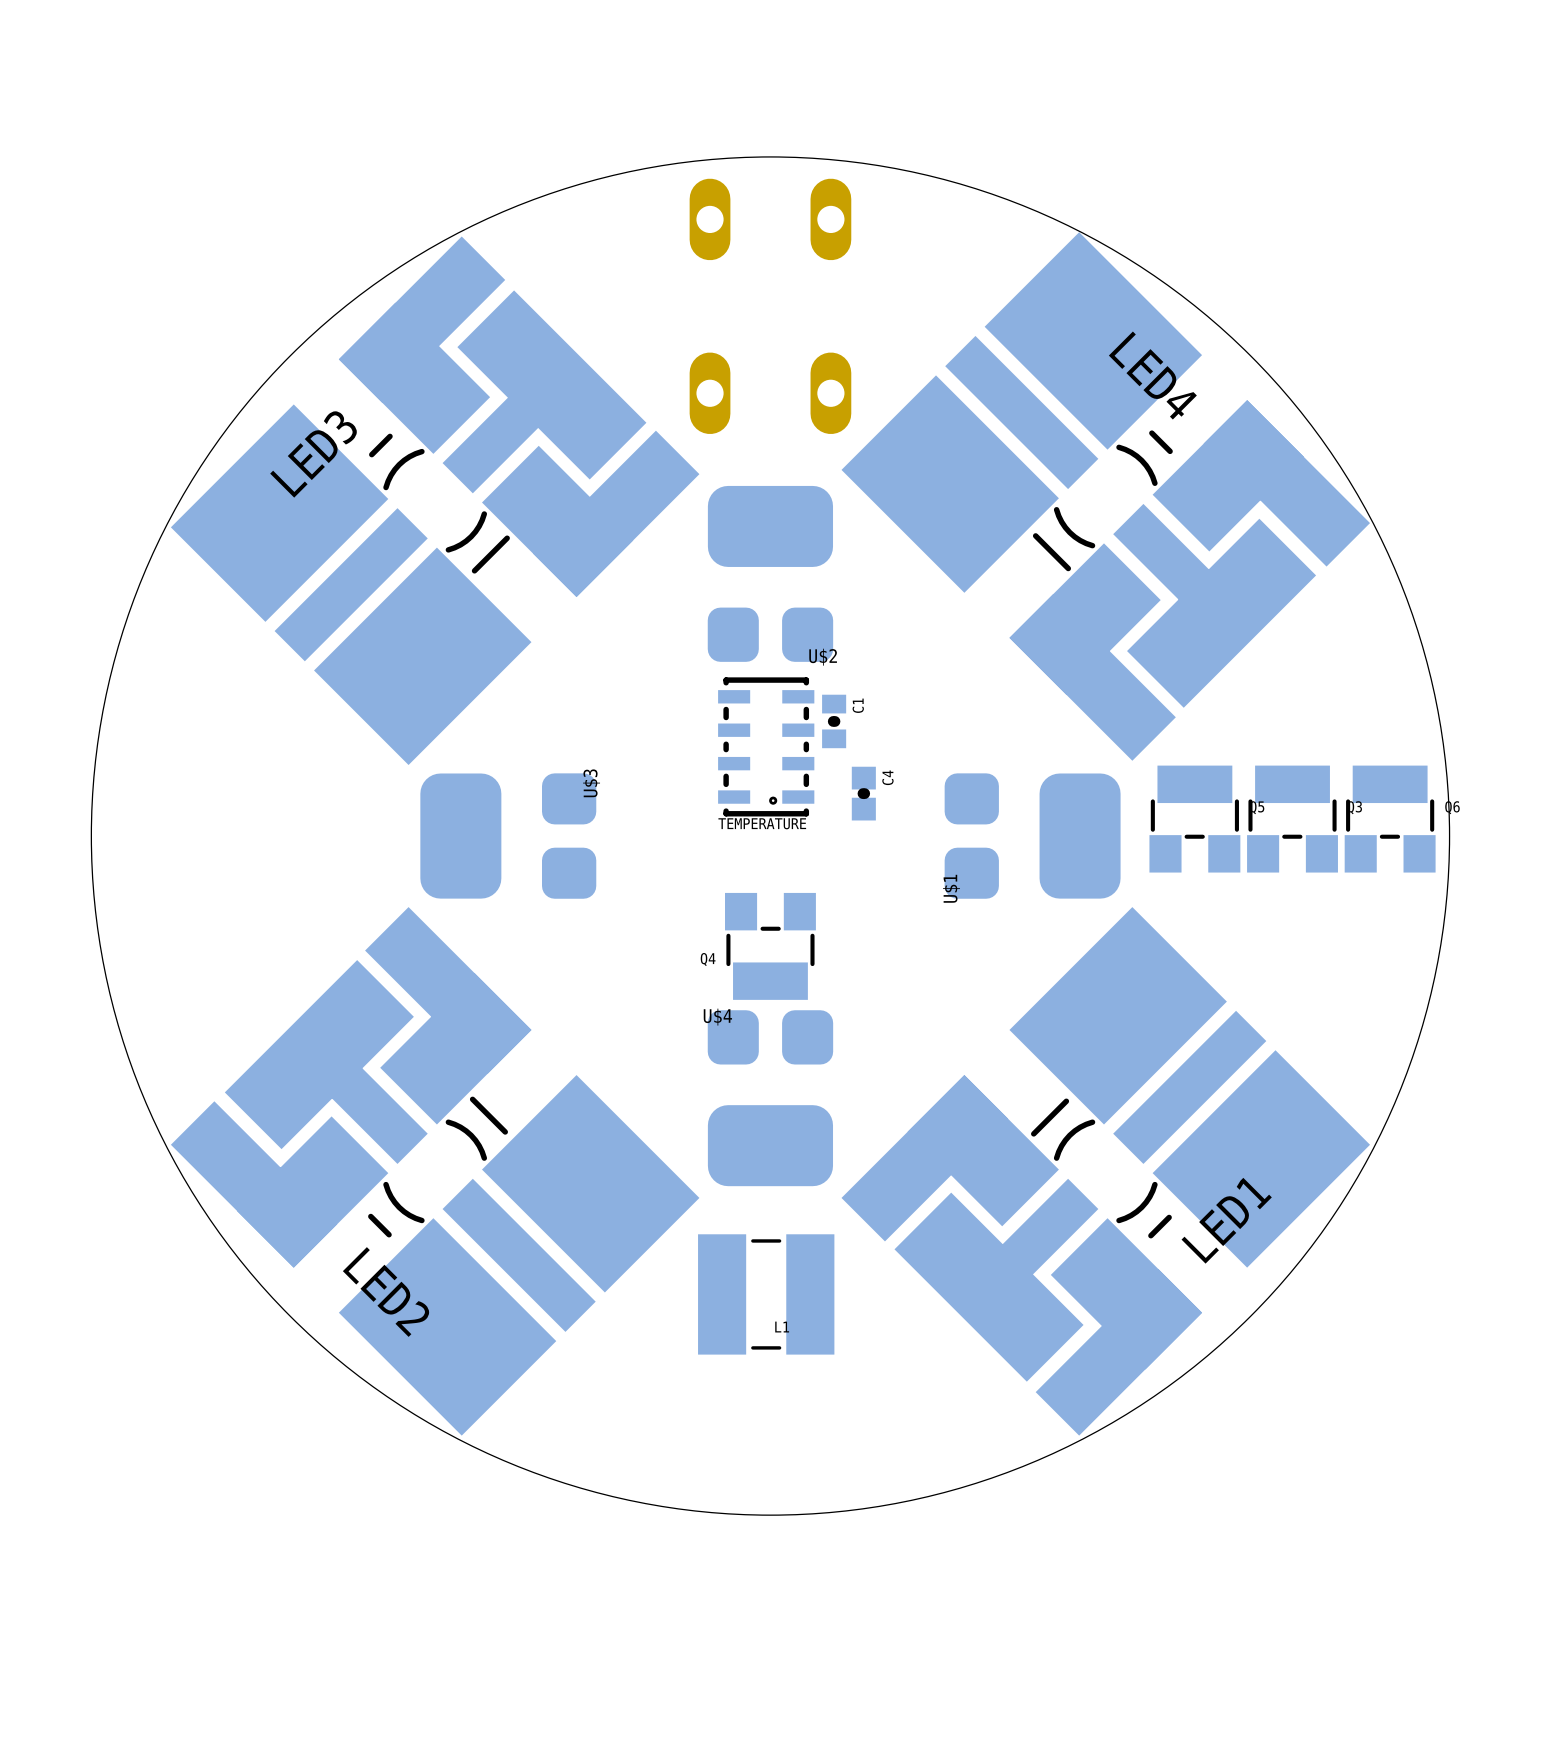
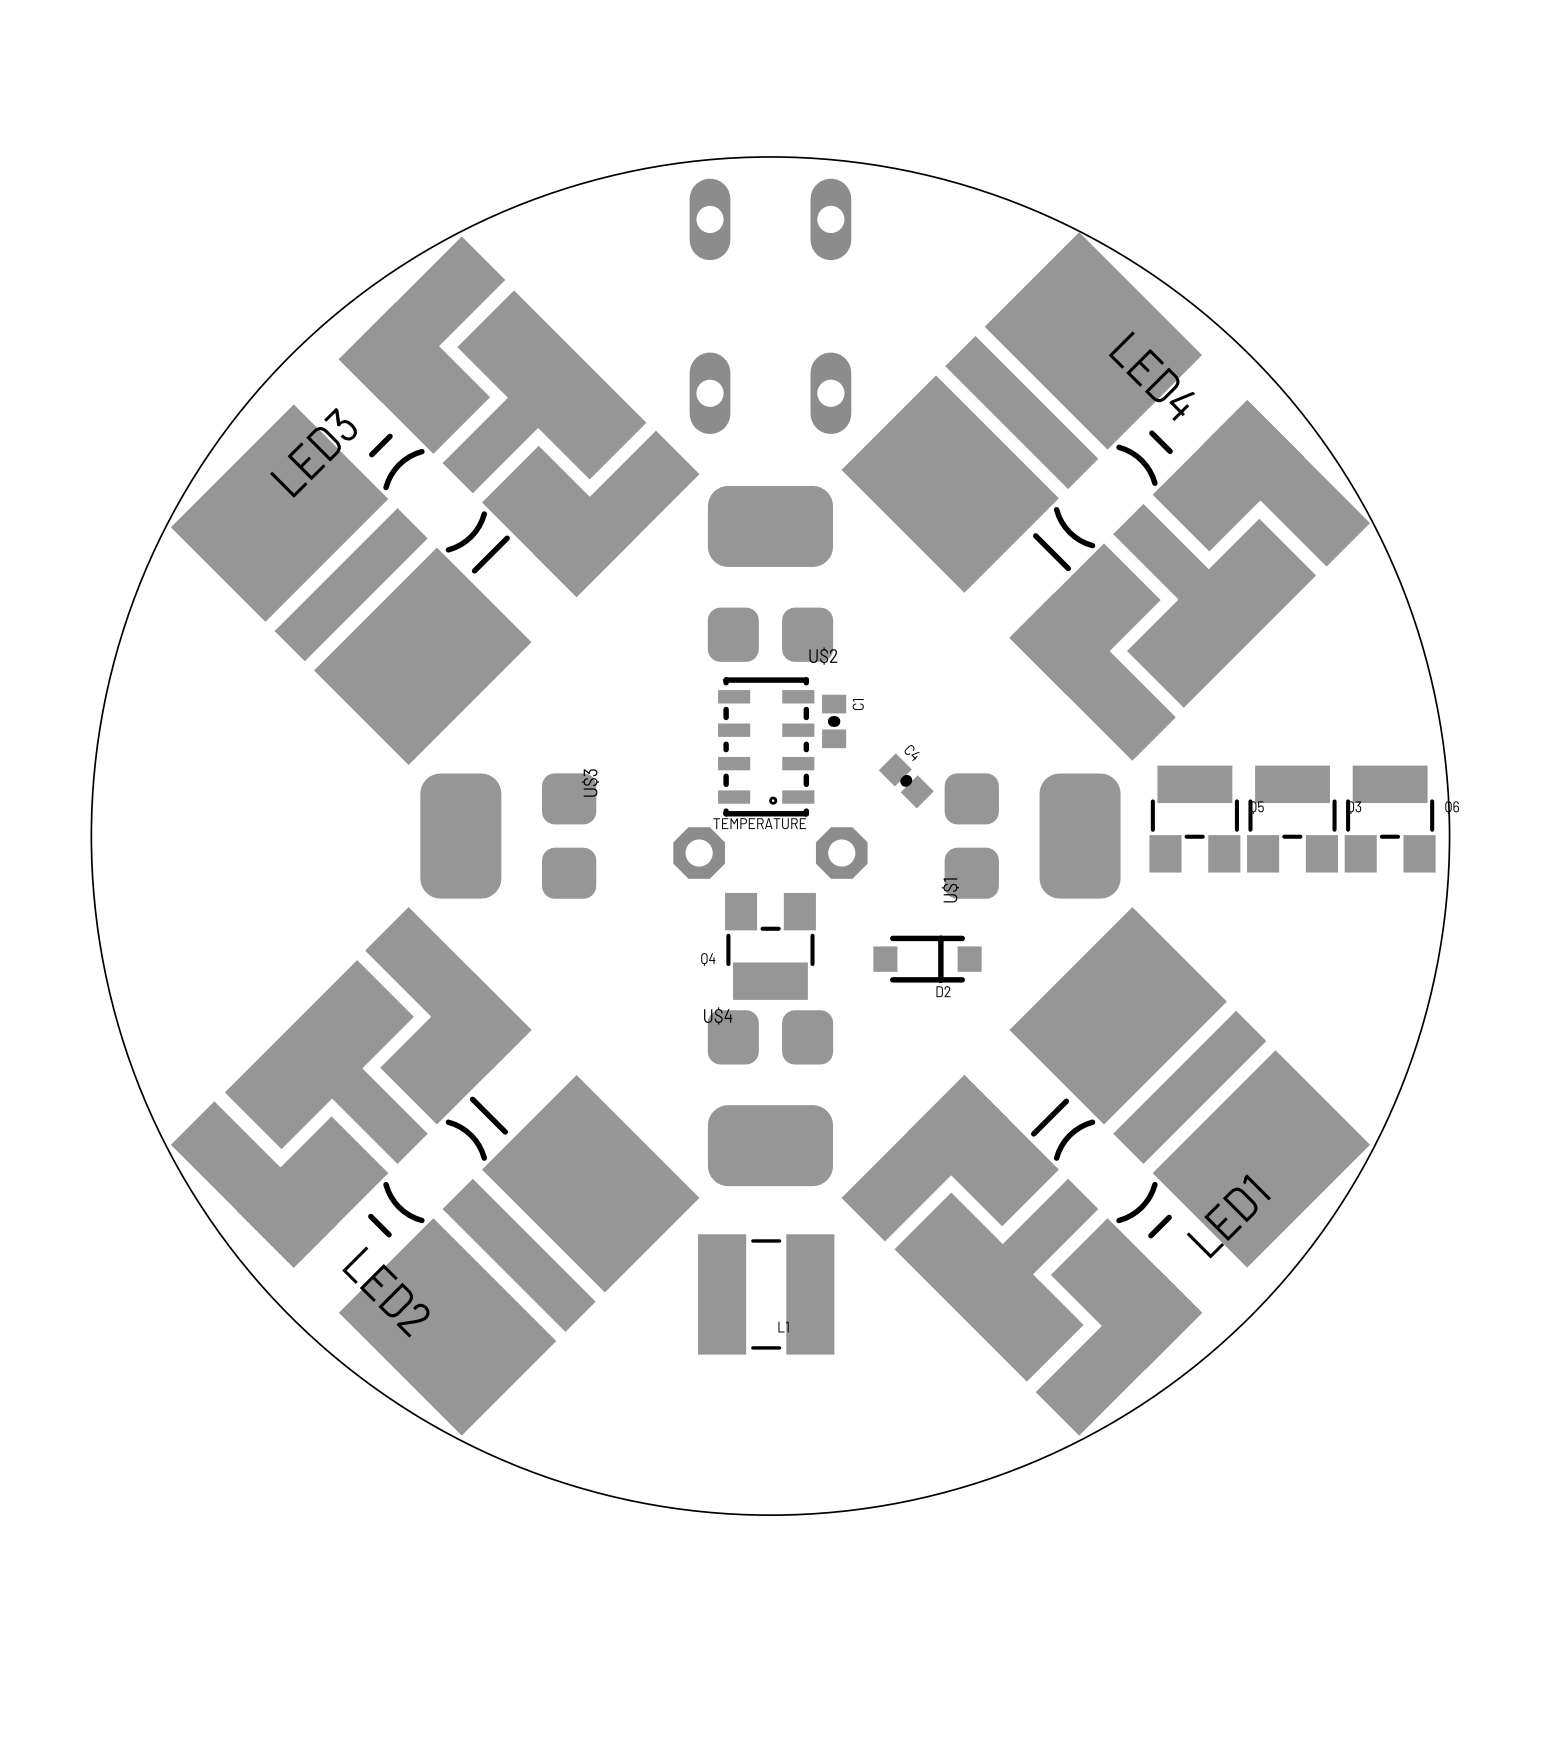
C4 rotation: 0° (863, 793) -> 45° counterclockwise (906, 780)
C4 position: (863, 793) -> (906, 780)
part: none -> (699, 853)
part: none -> (841, 853)
D2: none -> (927, 959)

